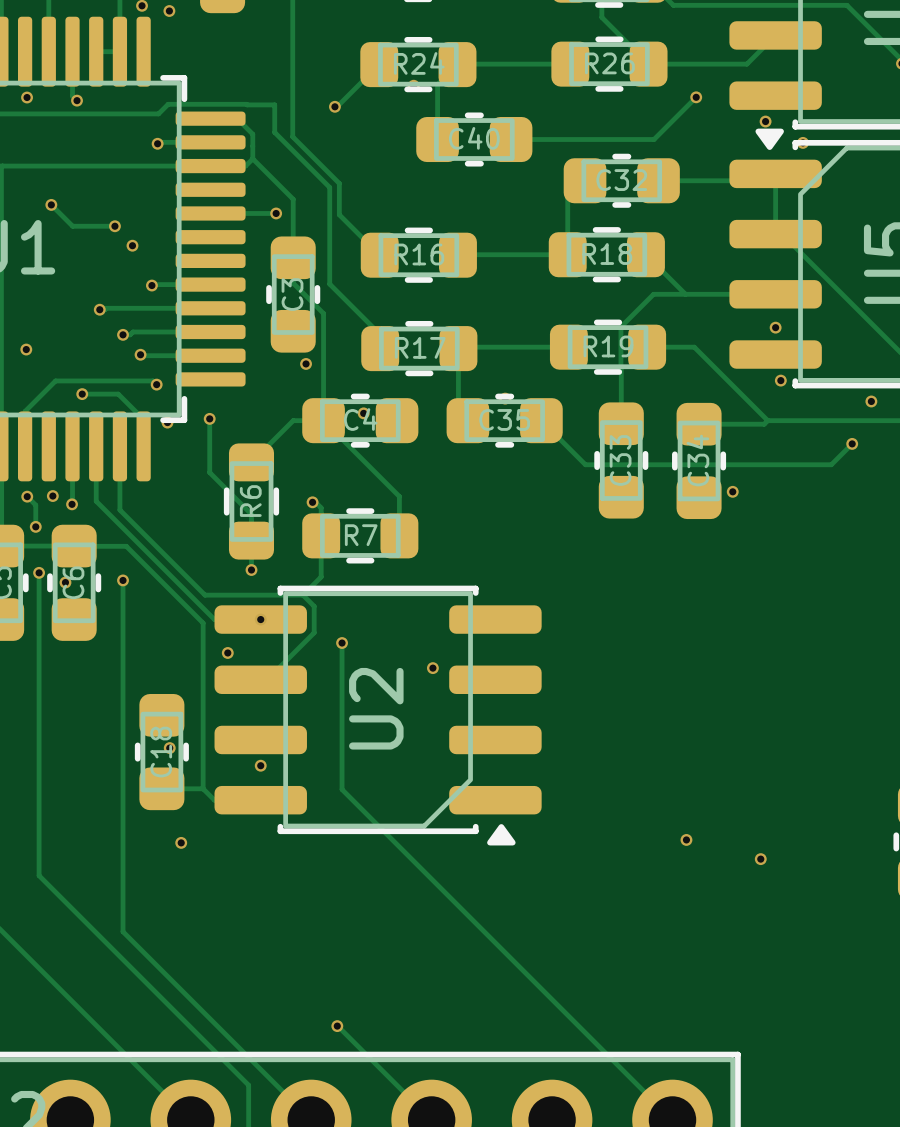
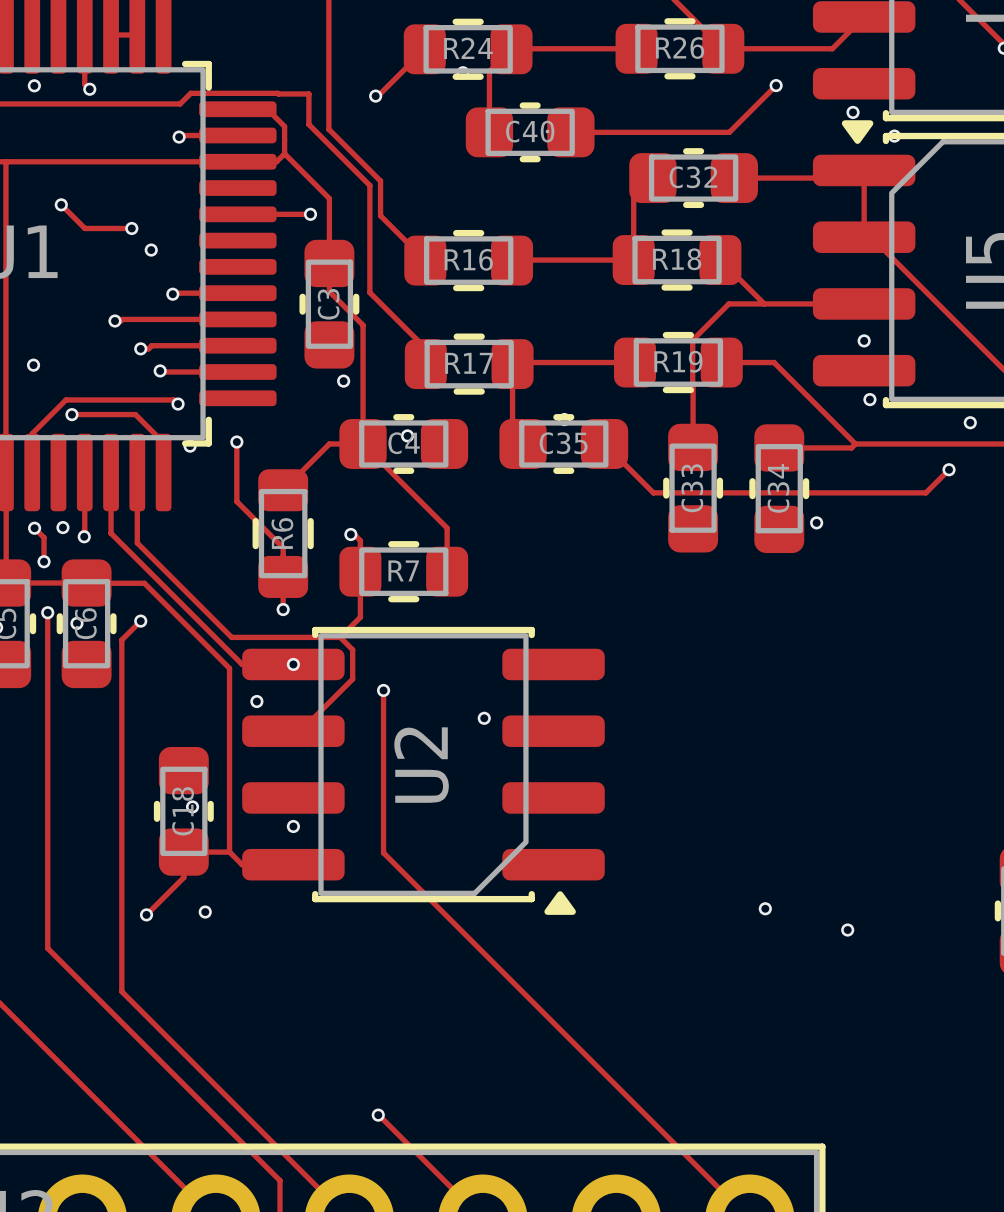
track: none -> (72, 414) (95, 414)
via position: (82, 394) -> (71, 414)
track: (123, 580) (123, 931) -> (140, 621) (121, 640) (121, 991) (140, 1010)
track: none -> (183, 852) (183, 877) (146, 914)
via: none -> (146, 914)

